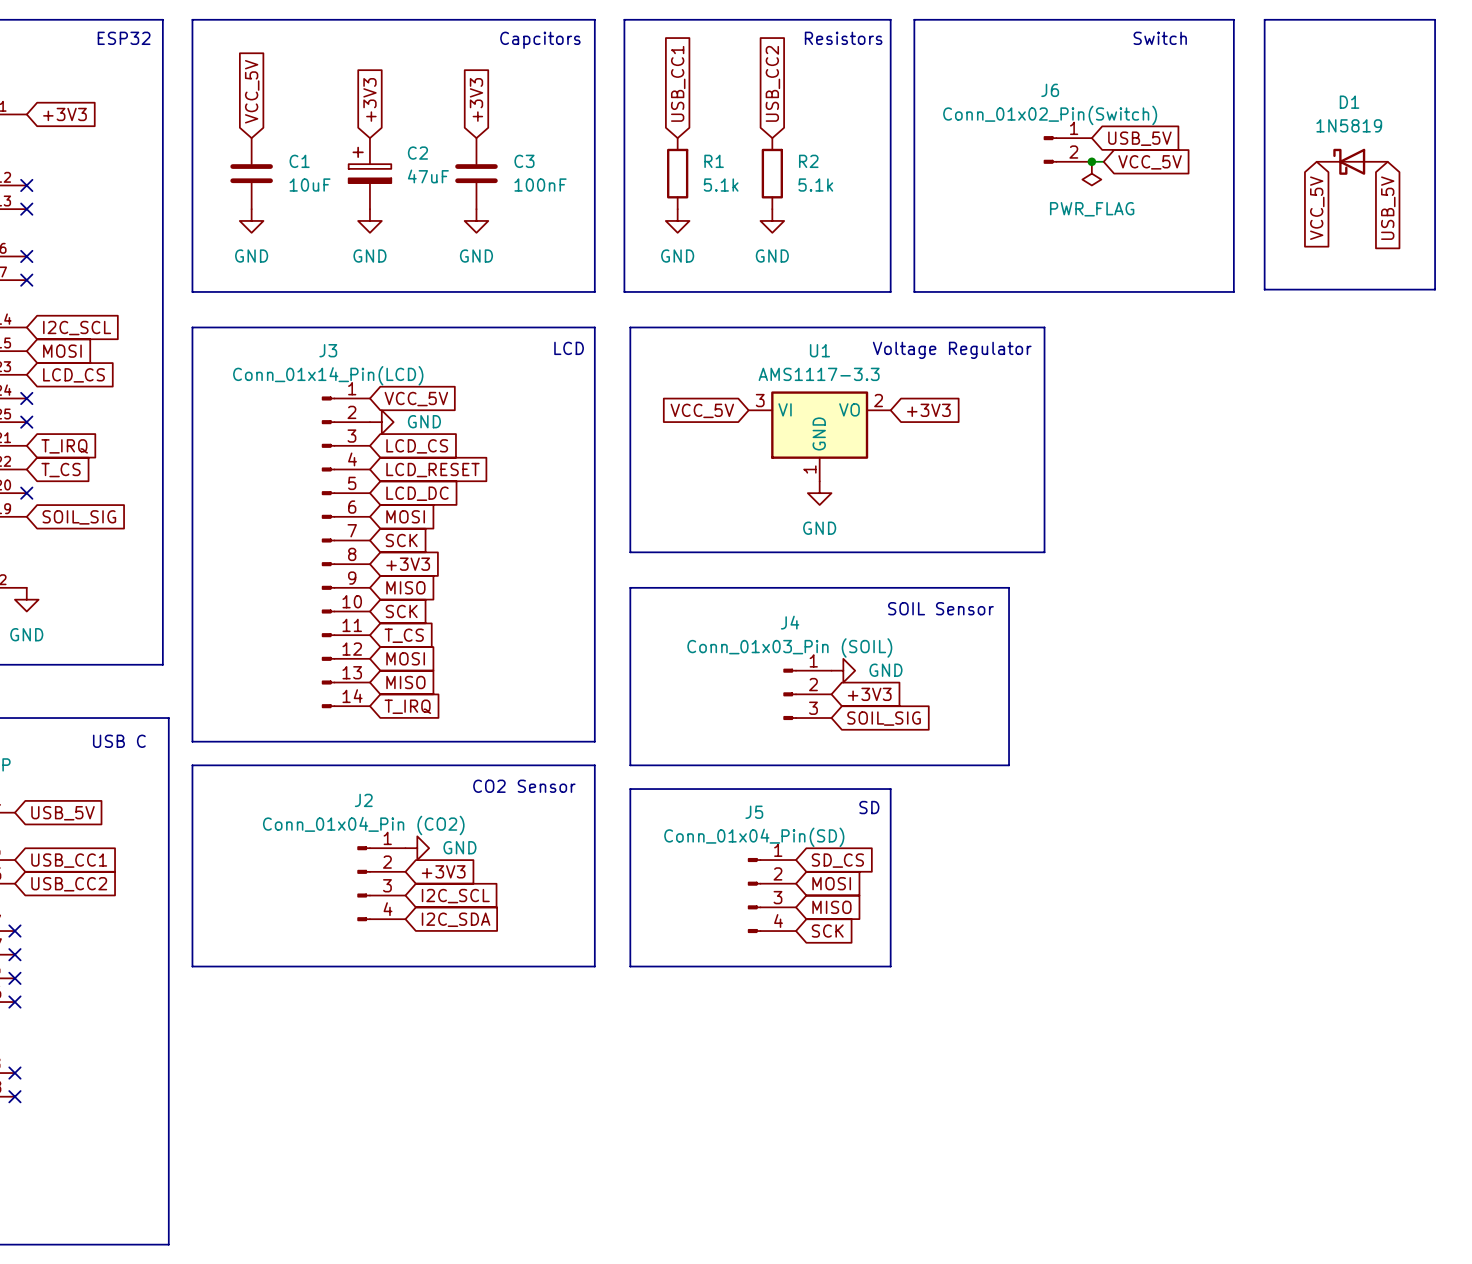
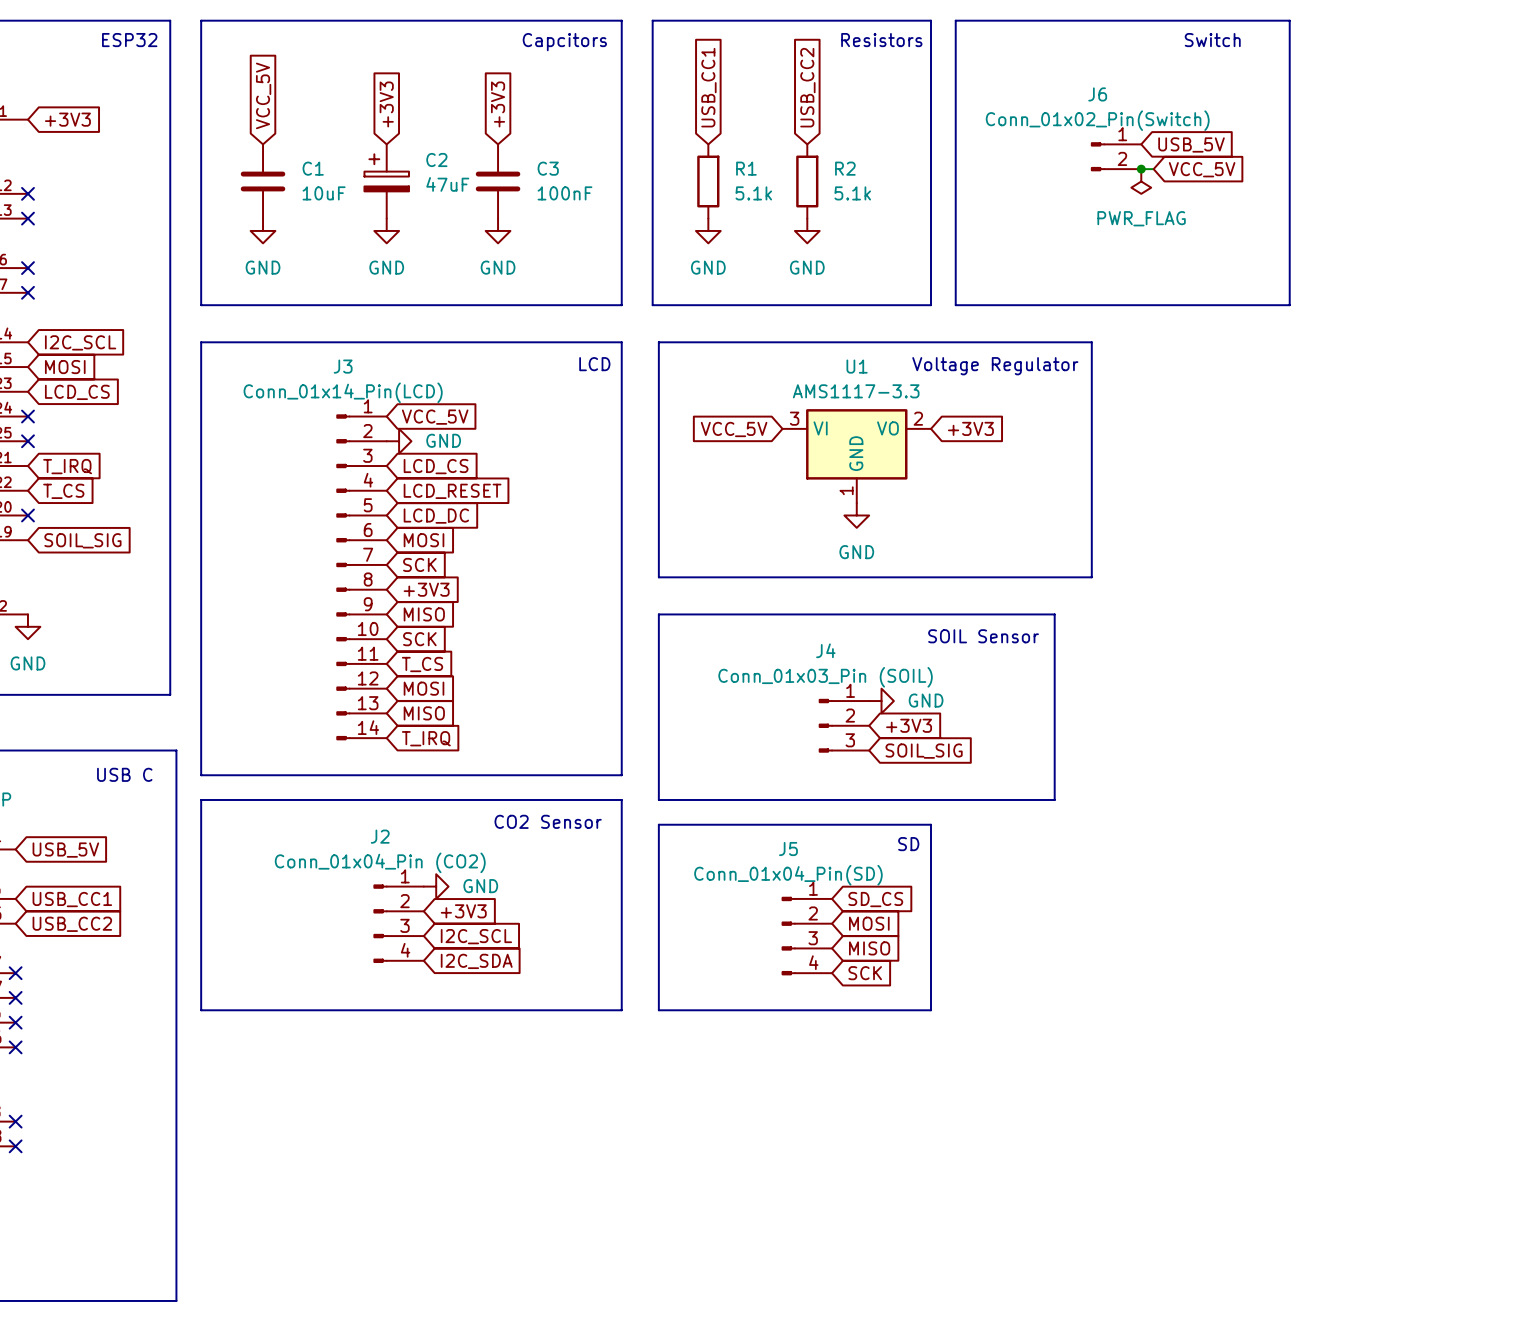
line: (1264, 19) (1435, 19) (1435, 289) (1264, 289) (1264, 19) -> none
D1: 1N5819 (1352, 161) -> none
global label: VCC_5V (1317, 208) -> none
global label: USB_5V (1388, 208) -> none

